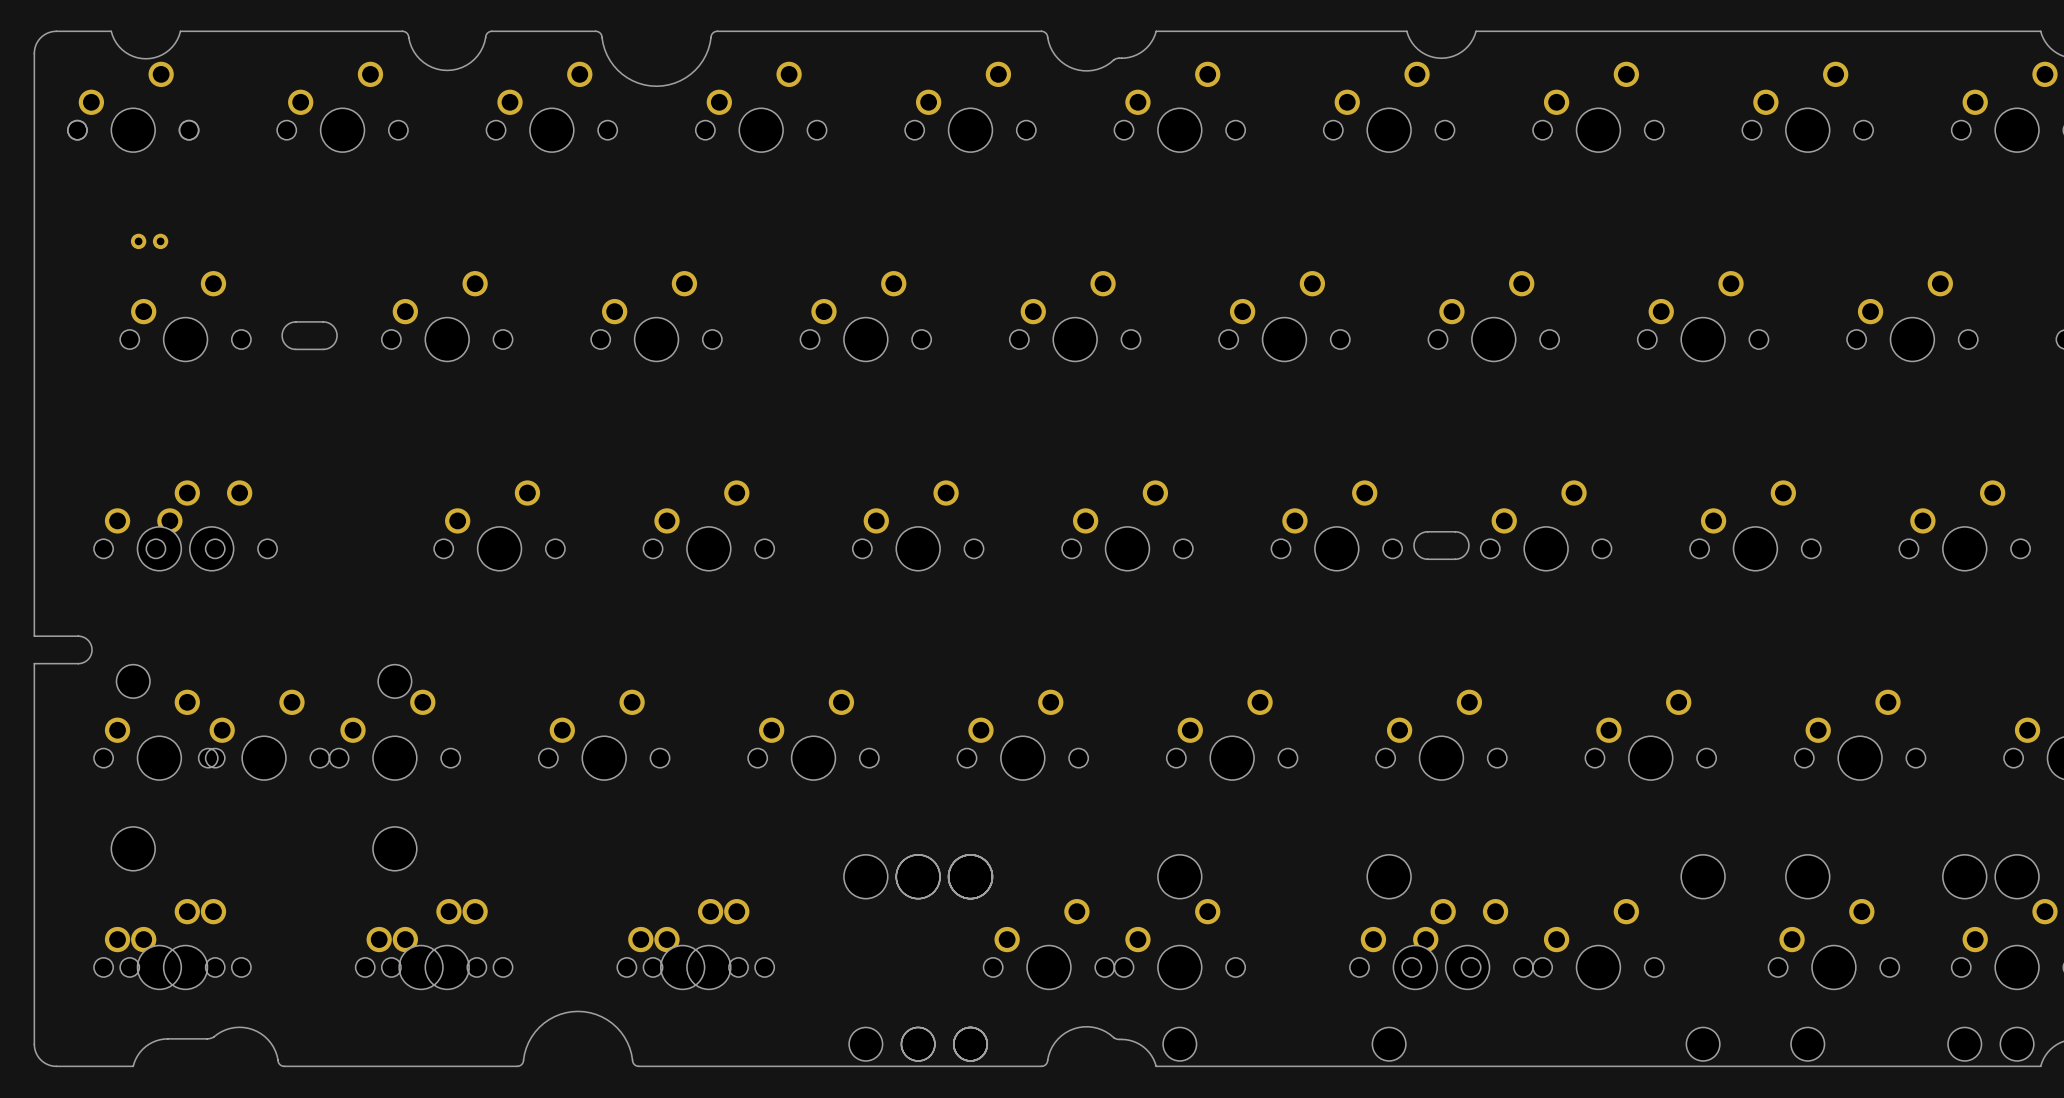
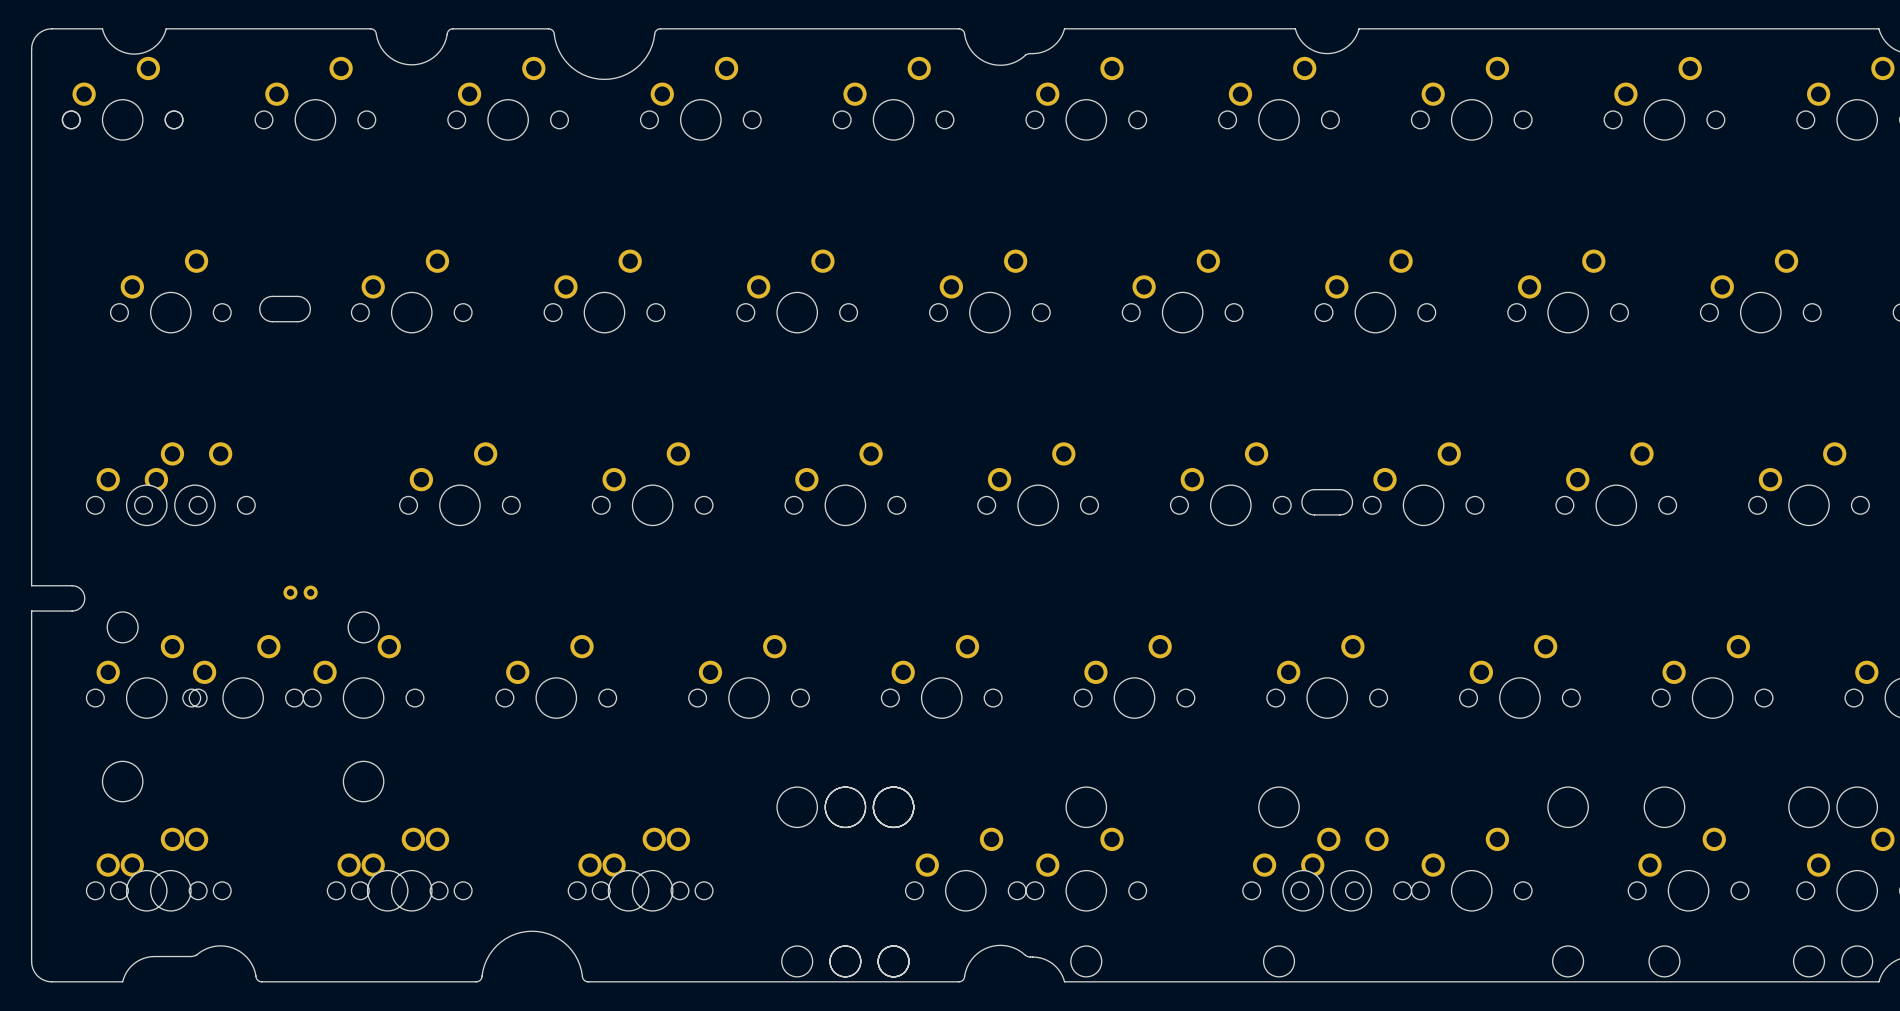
part: (149, 241) -> none
part: none -> (300, 592)

